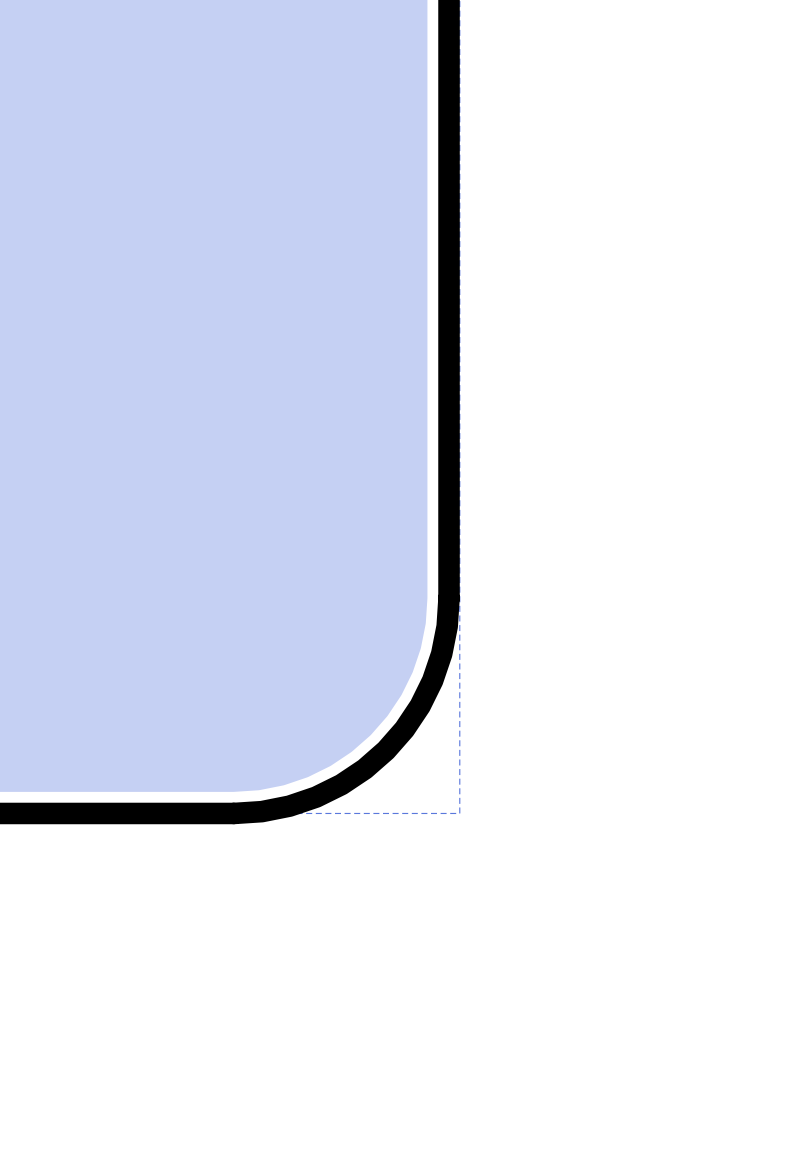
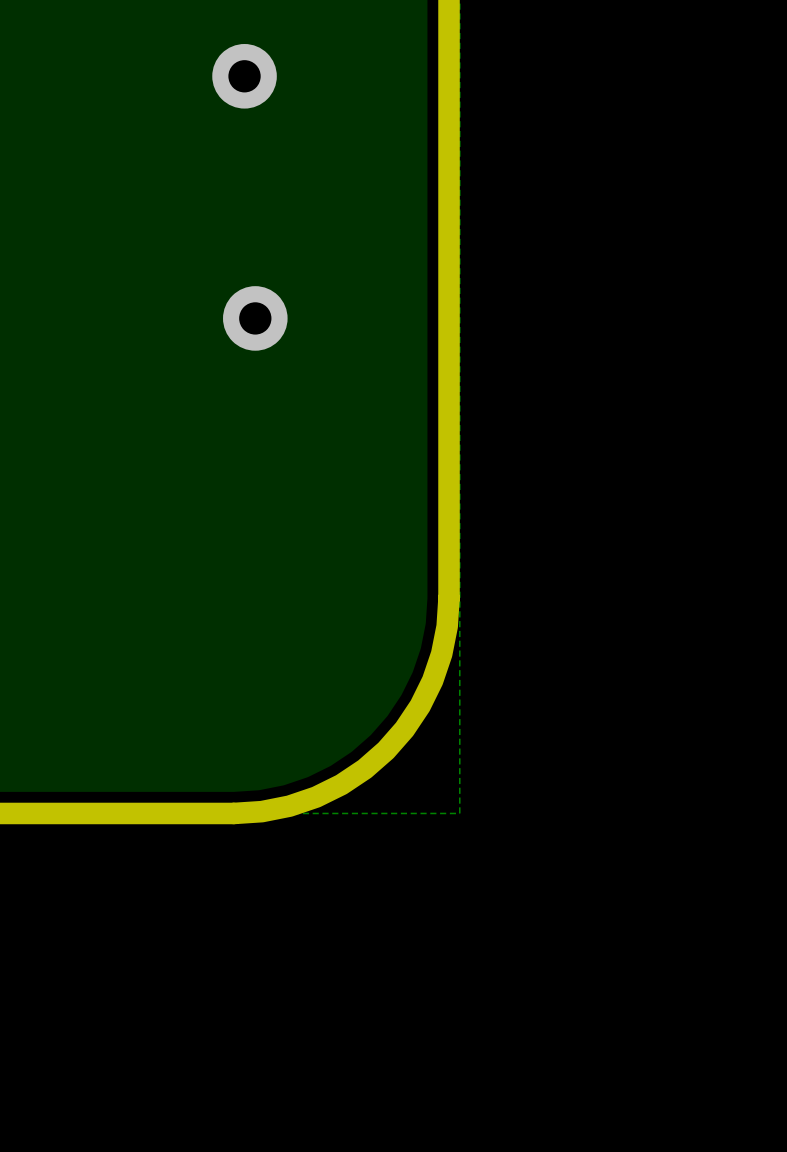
via: none -> (244, 76)
via: none -> (255, 318)

